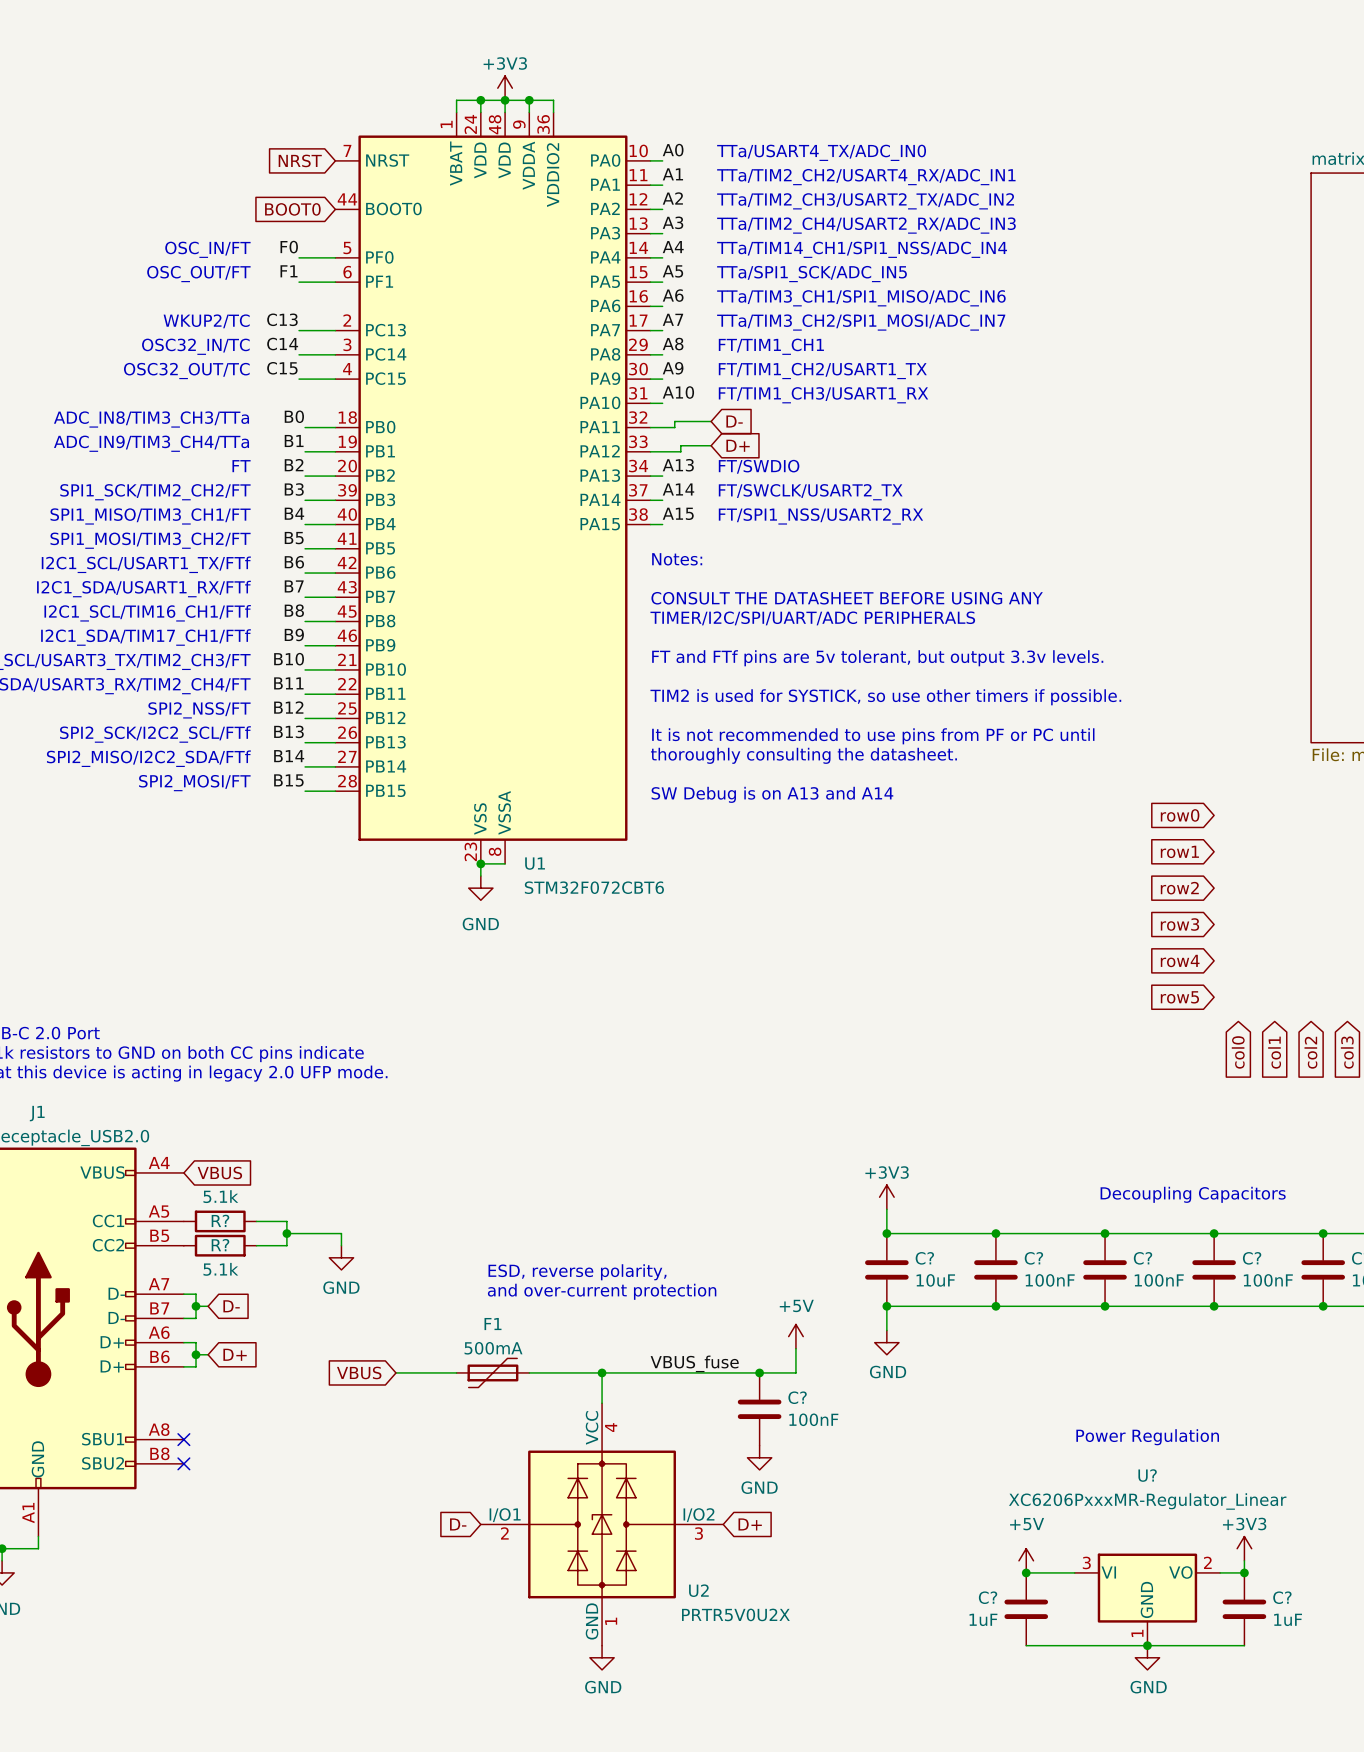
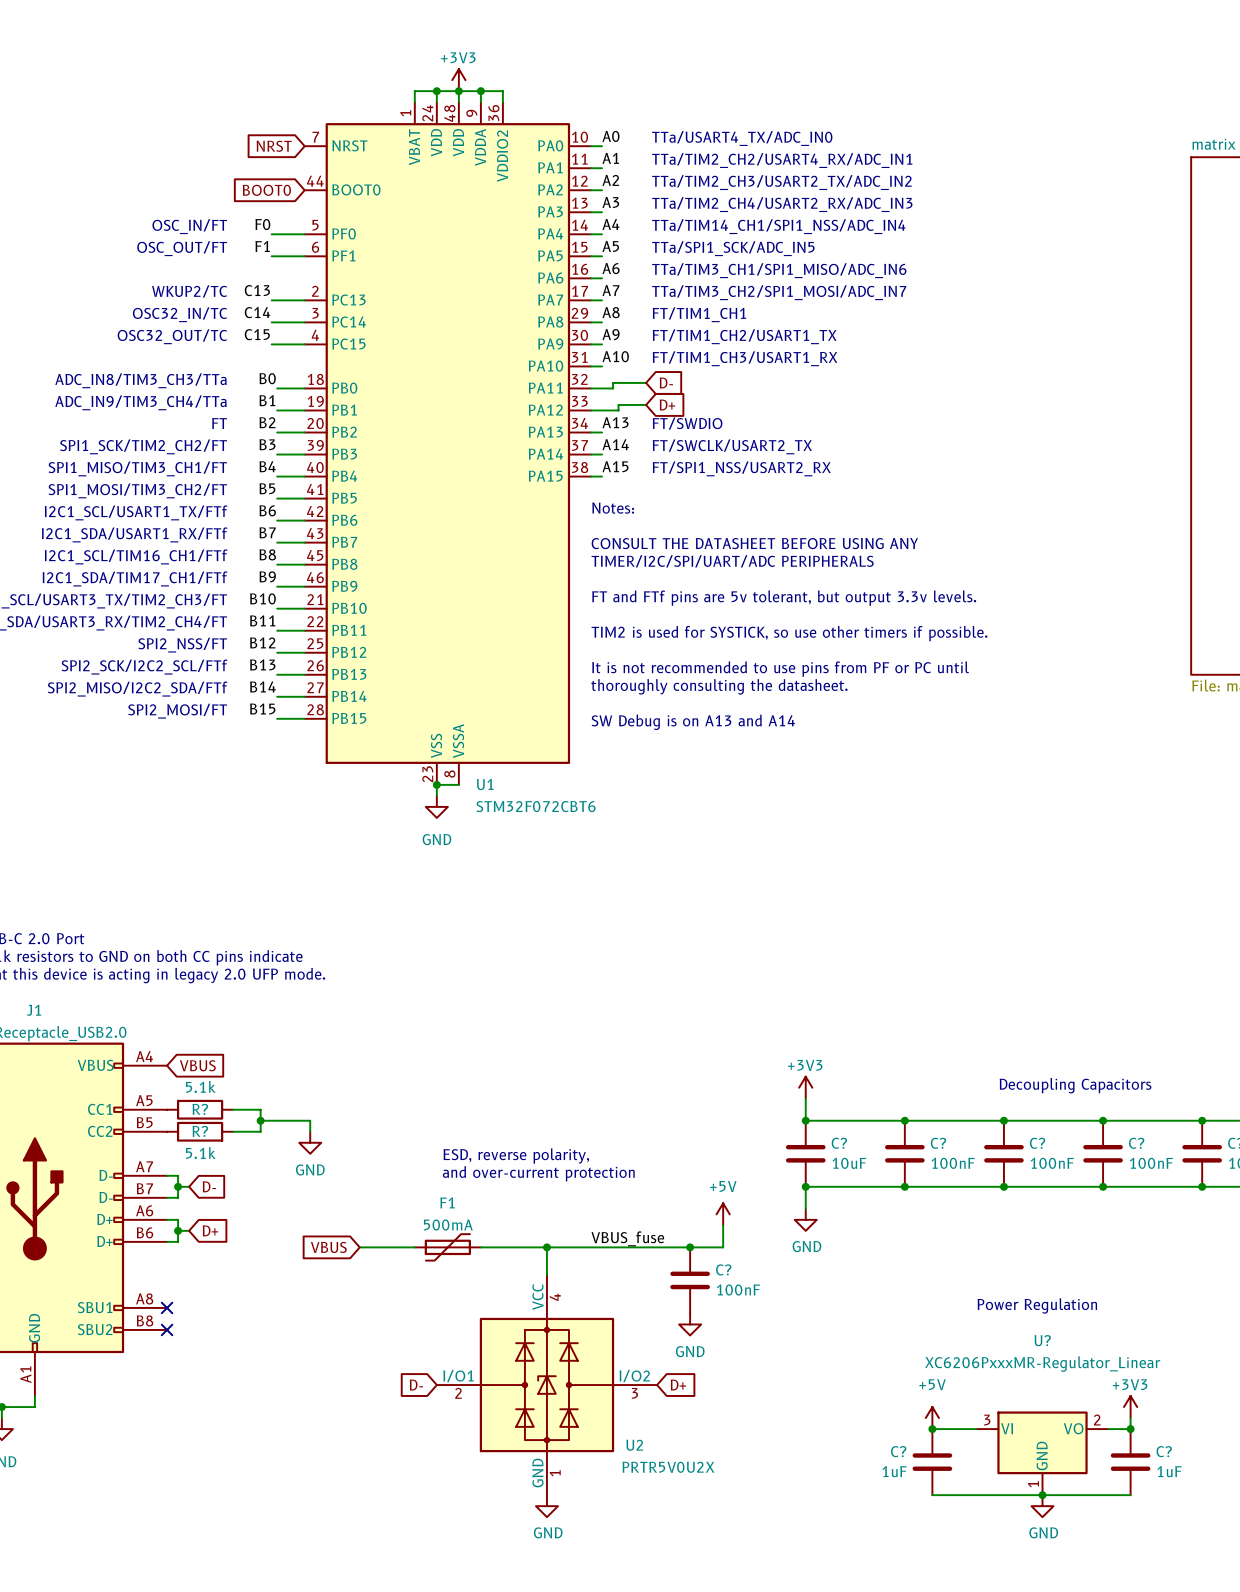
global label: row0 (1180, 815) -> none
global label: row1 (1179, 851) -> none
global label: row2 (1179, 888) -> none
global label: row3 (1179, 924) -> none
global label: row4 (1180, 960) -> none
global label: row5 (1179, 997) -> none
global label: col0 (1238, 1052) -> none
global label: col1 (1274, 1052) -> none
global label: col2 (1310, 1052) -> none
global label: col3 (1347, 1052) -> none

